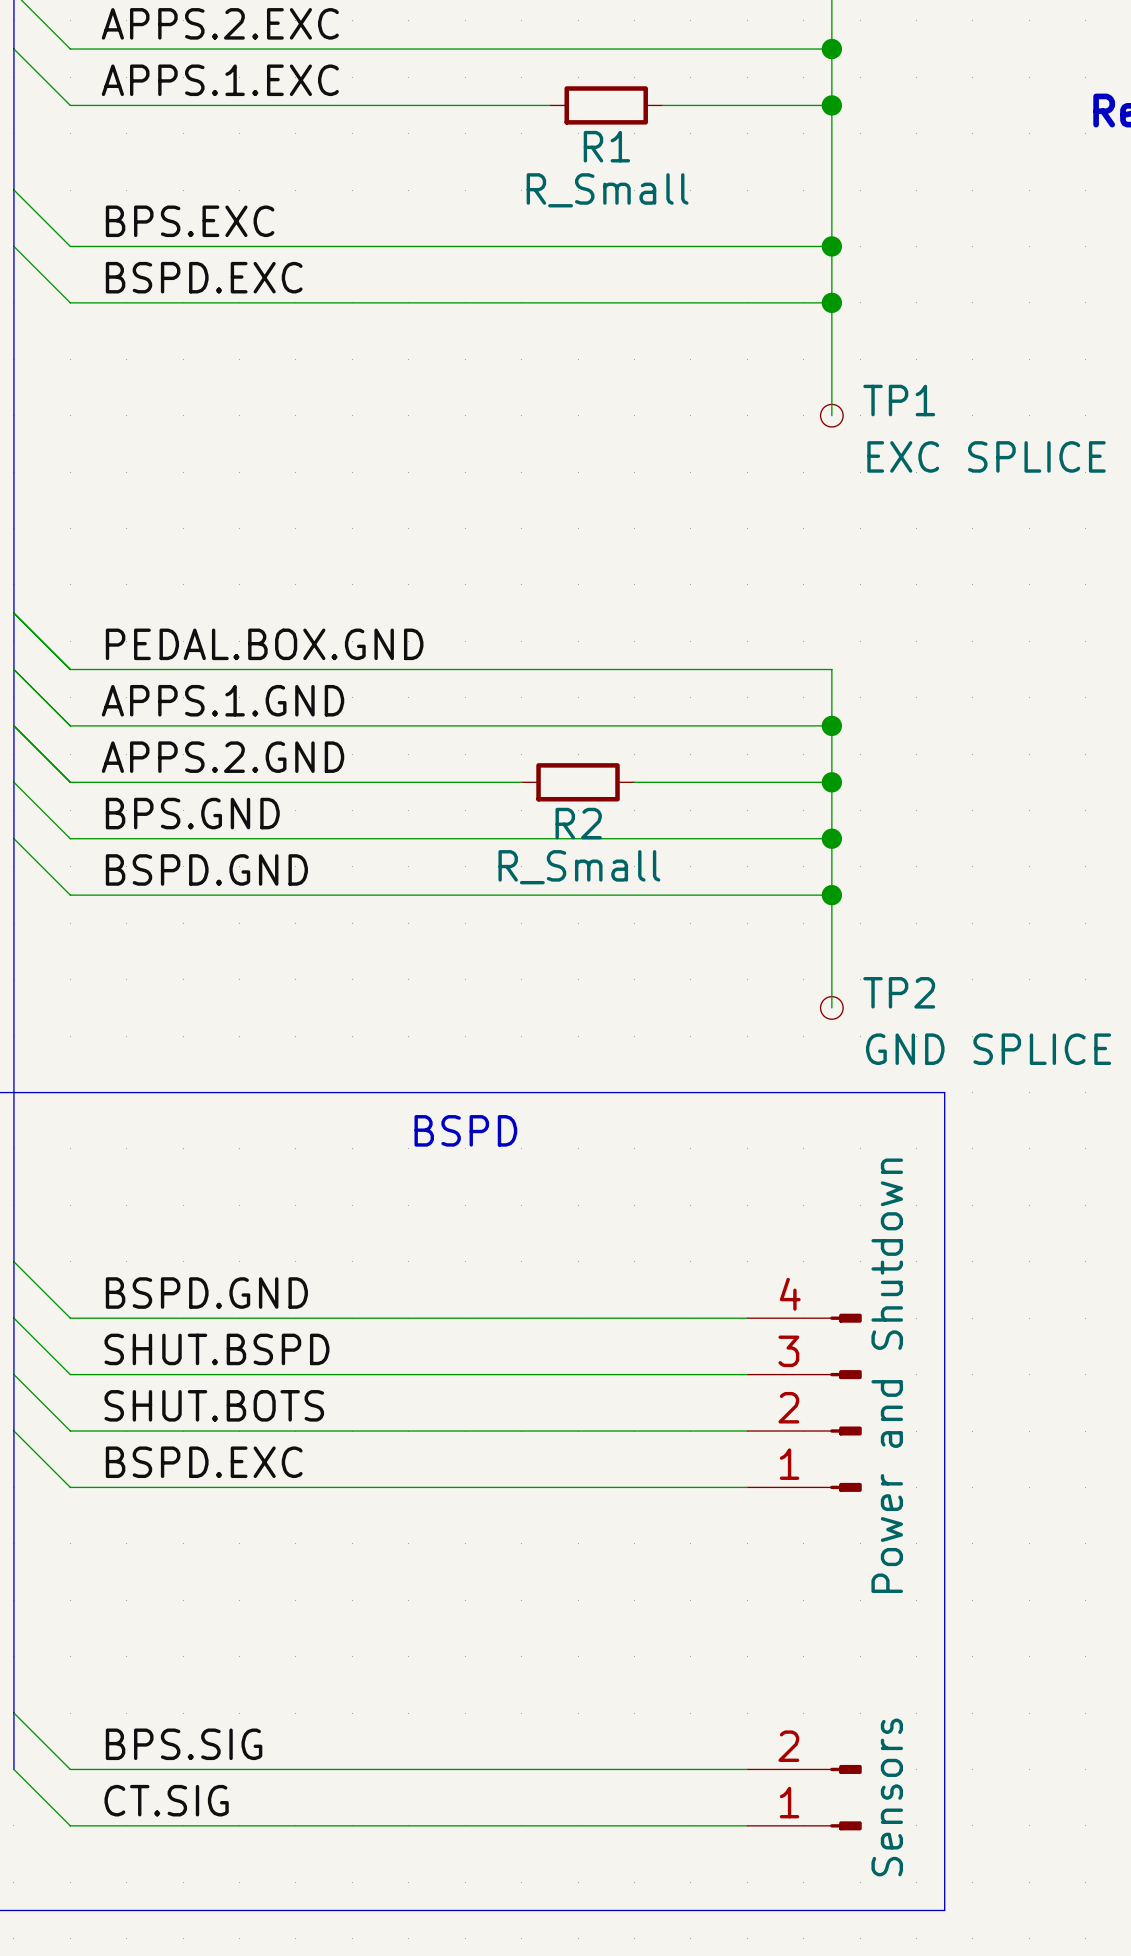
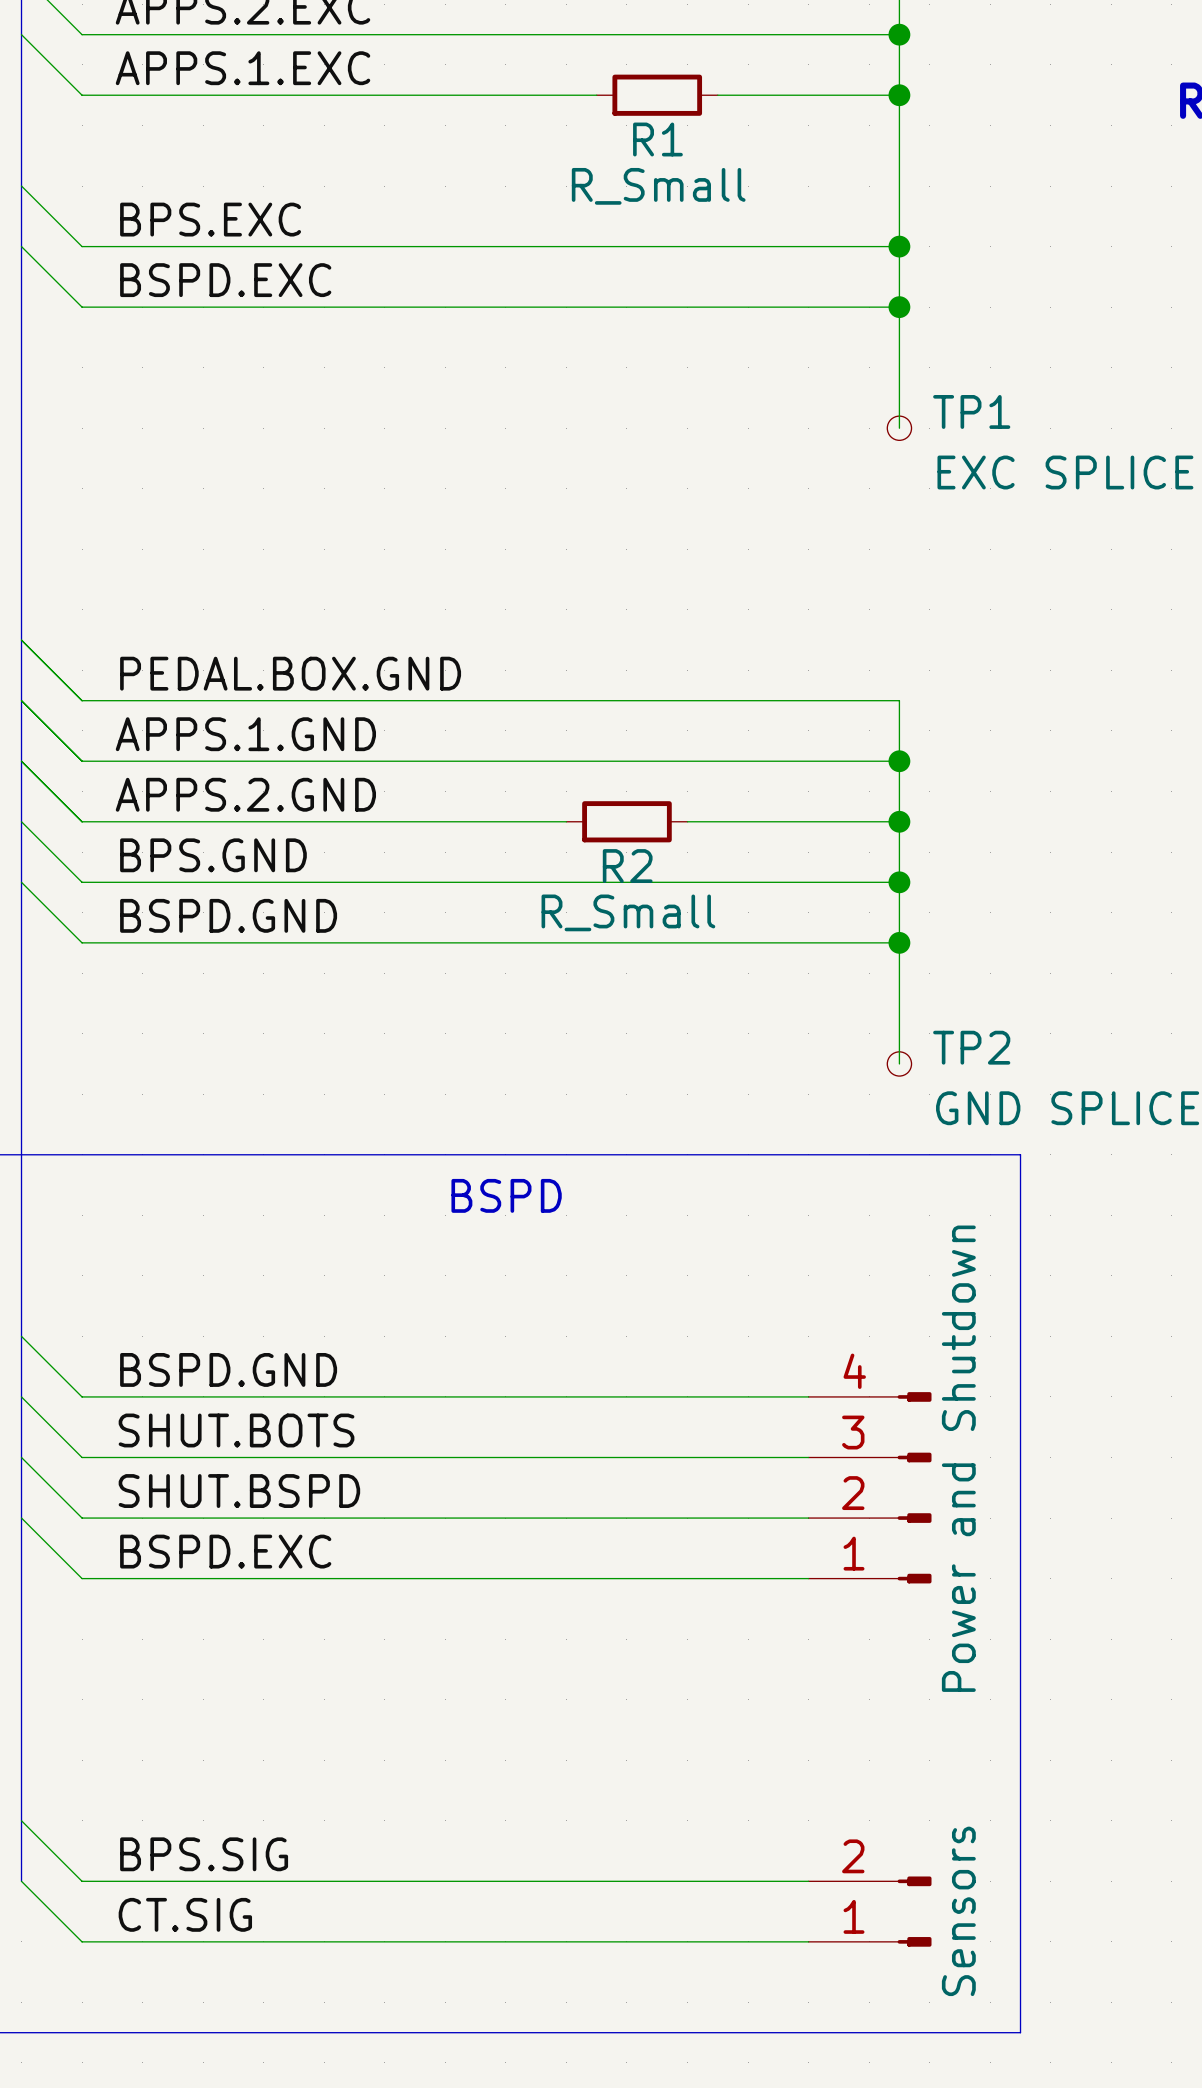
label: SHUT.BSPD (216, 1349) -> SHUT.BOTS (236, 1430)
label: SHUT.BOTS (214, 1405) -> SHUT.BSPD (239, 1491)

